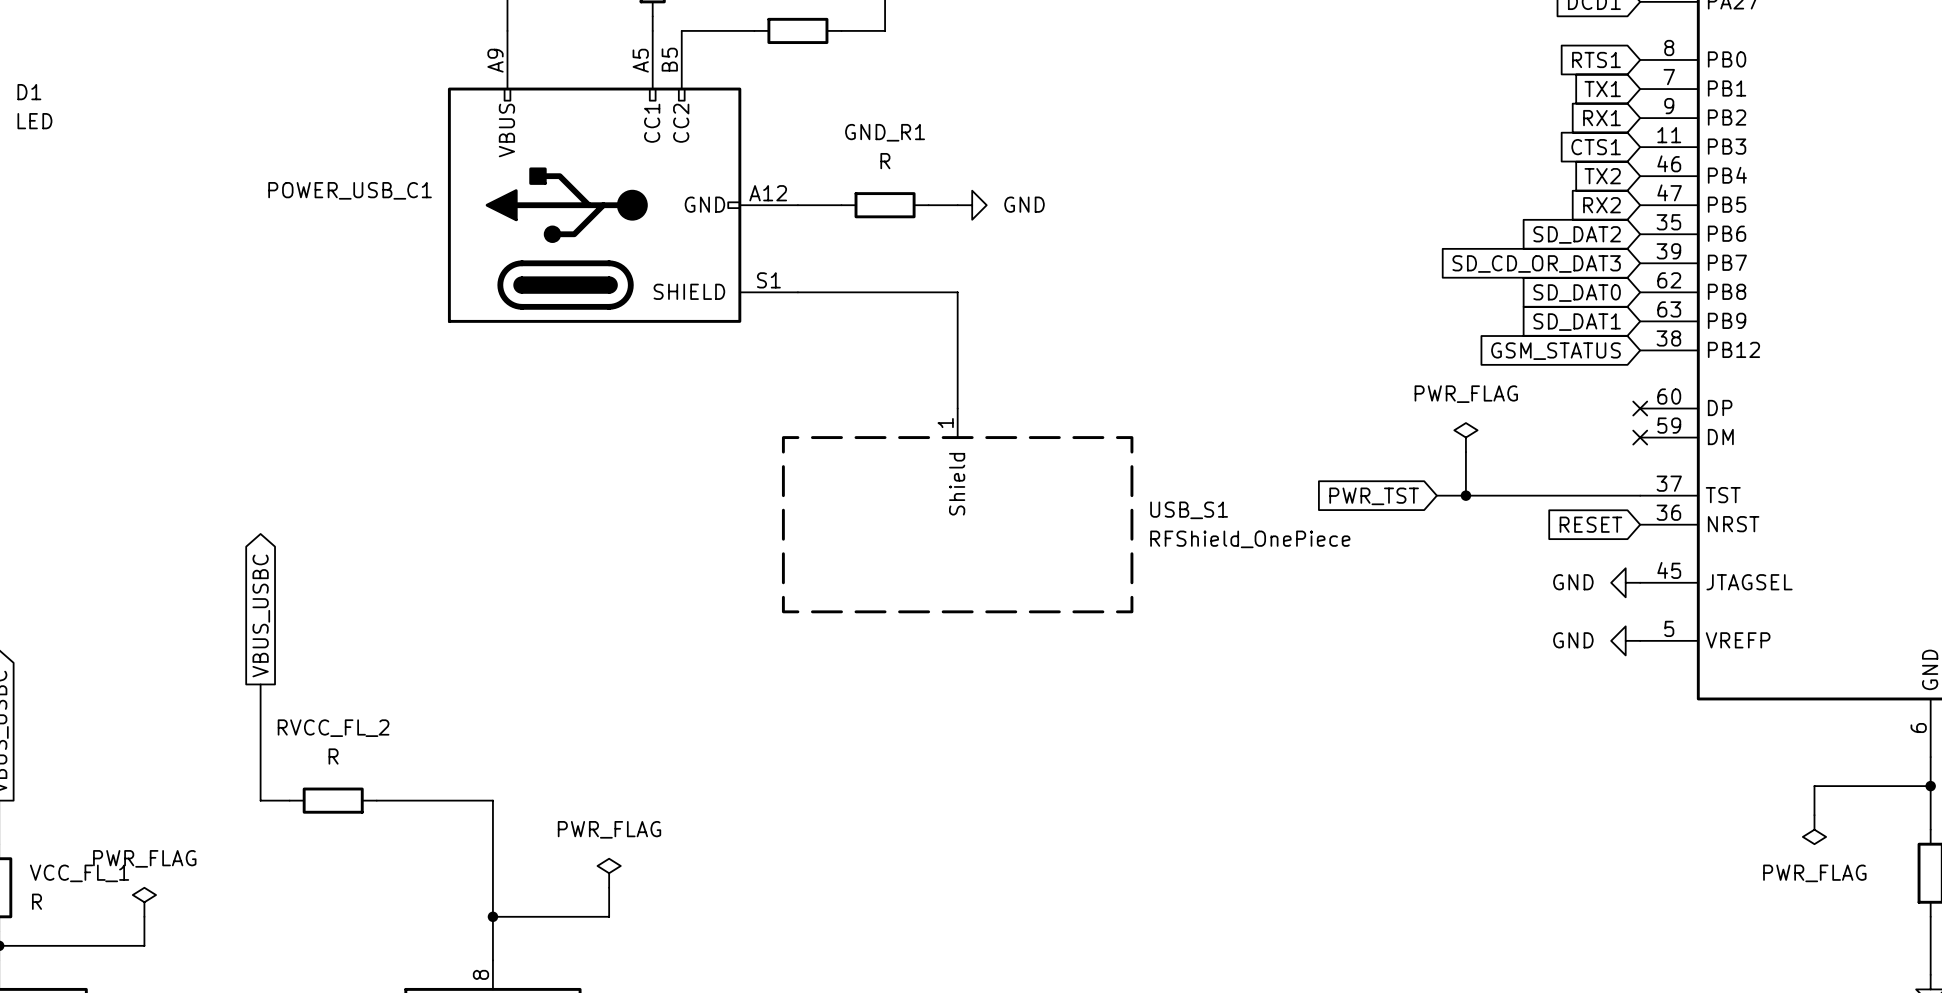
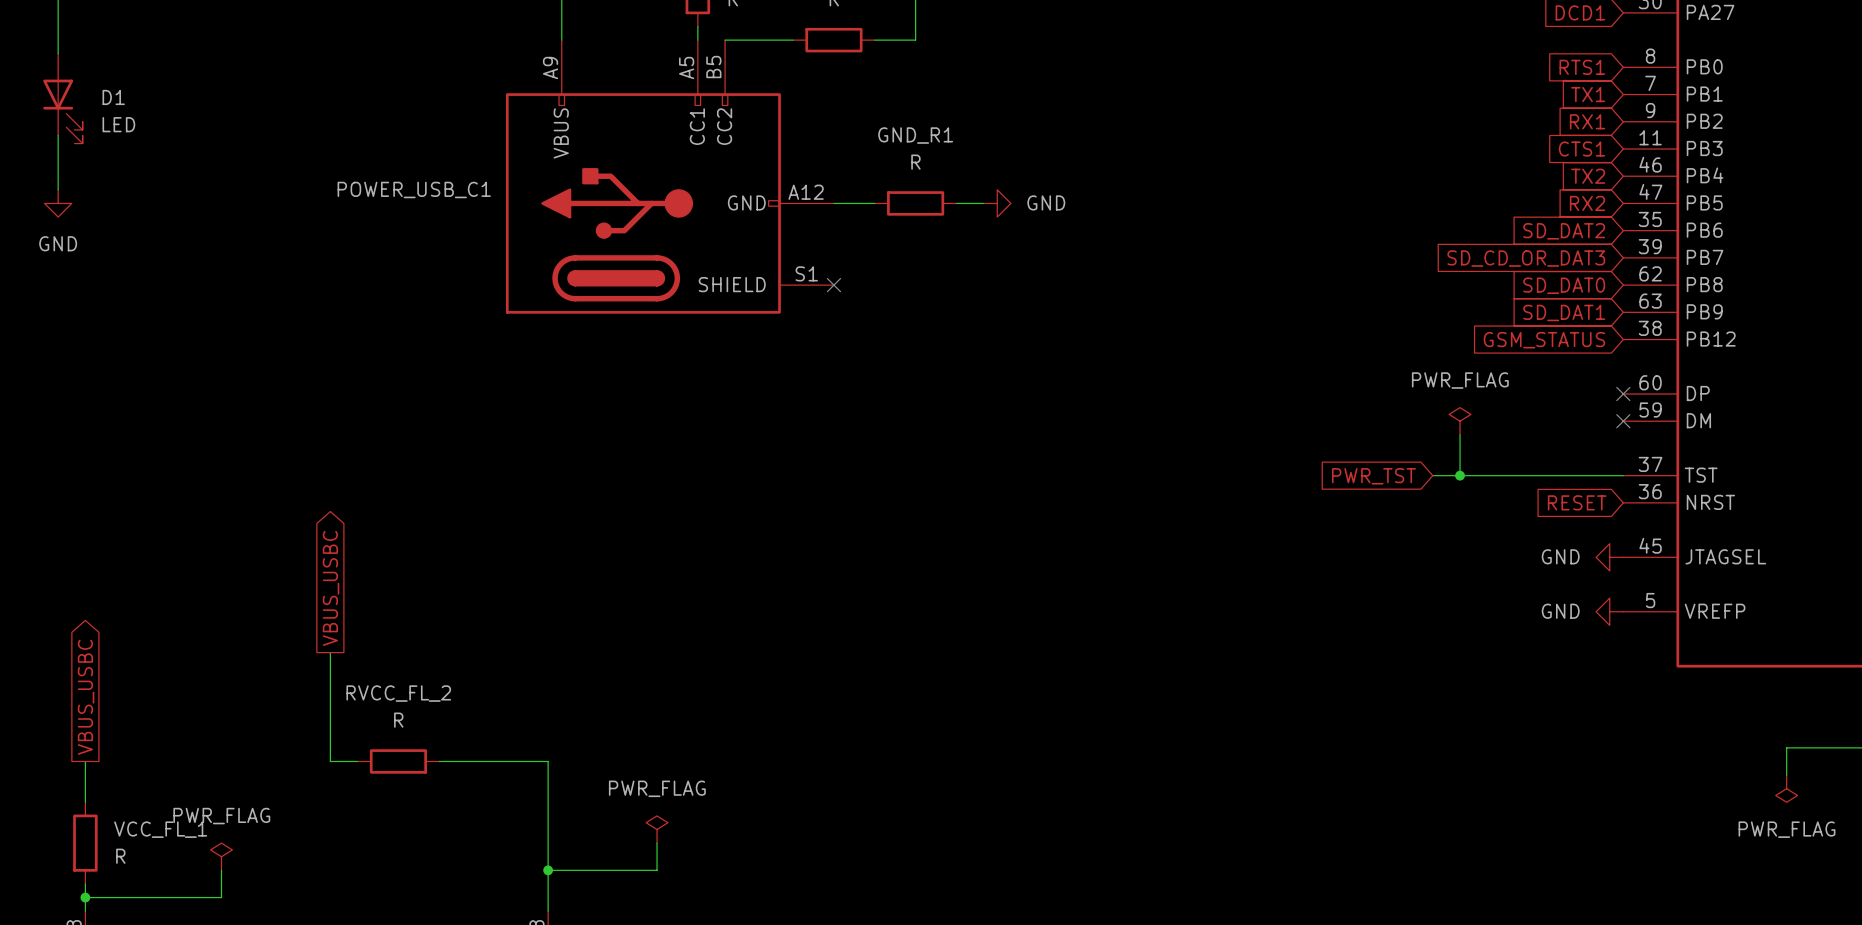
wire: (797, 292) (957, 292) (957, 408) -> none
no-connect mark: none -> (833, 285)
USB_S1: RFShield_OnePiece (957, 510) -> none

